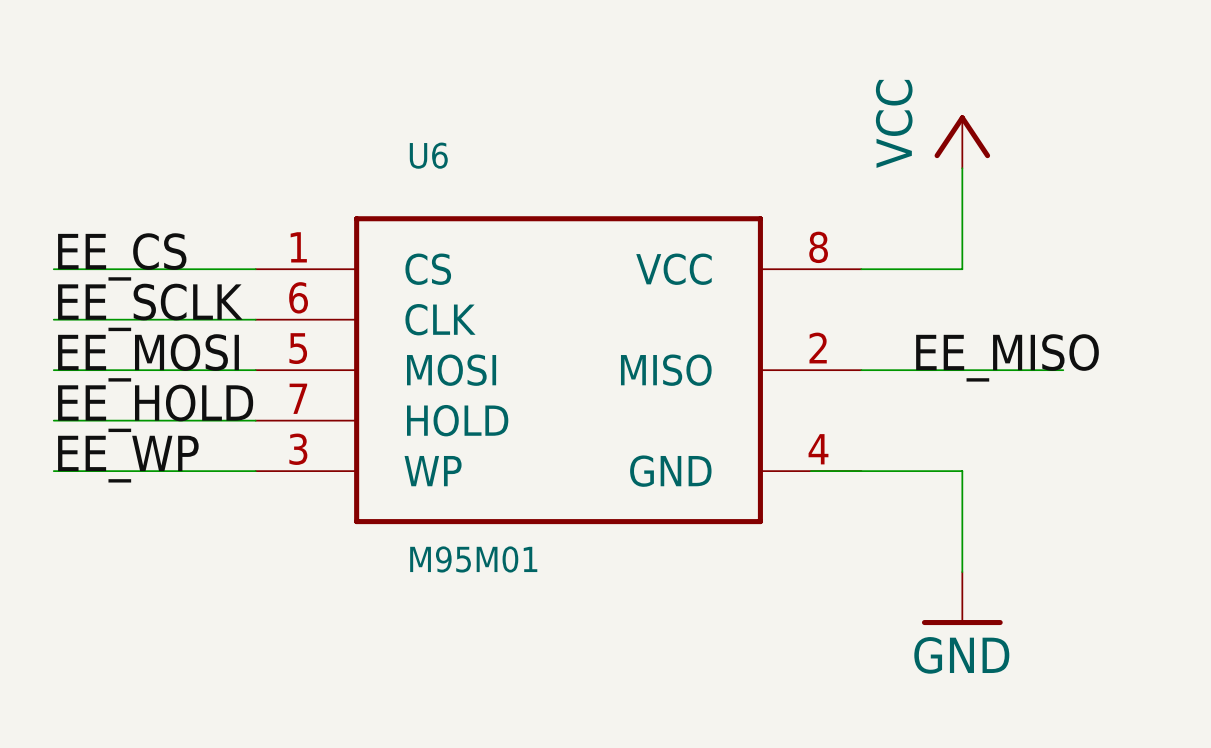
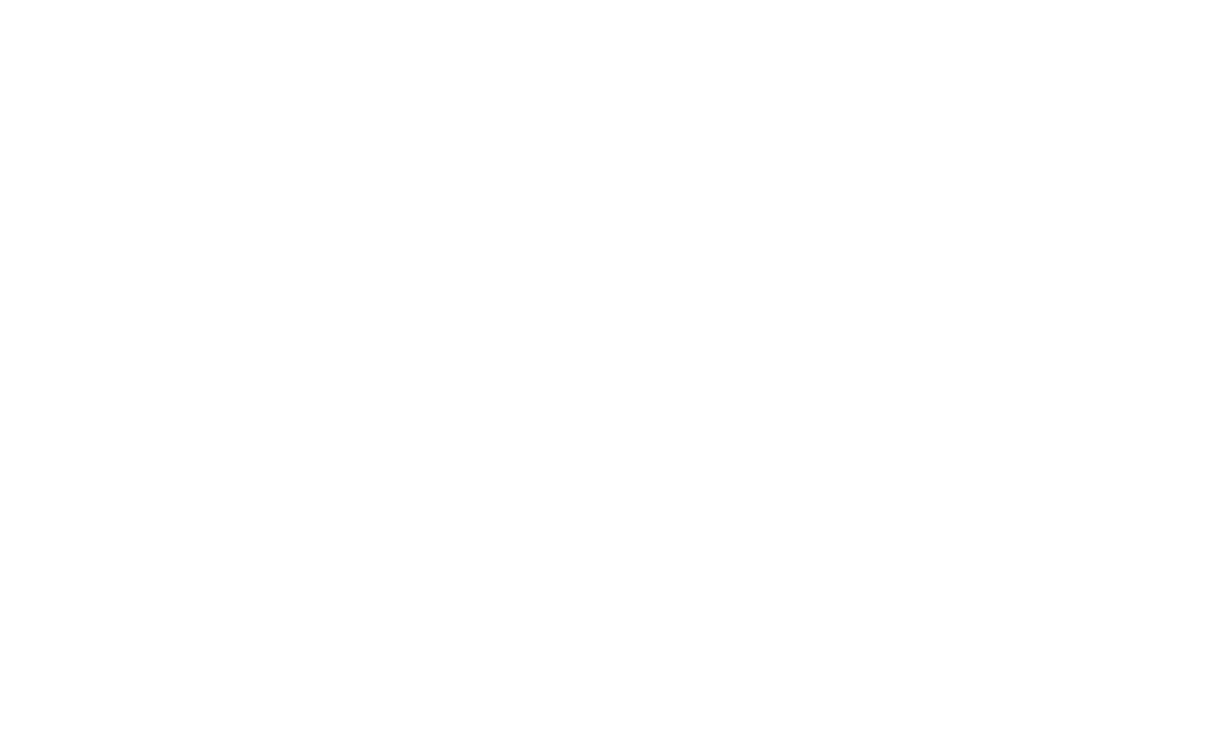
power symbol: VCC (962, 141) -> none
wire: (962, 168) (962, 269) (861, 269) -> none
label: EE_CS (122, 256) -> none
wire: (53, 269) (255, 269) -> none
label: EE_SCLK (150, 307) -> none
wire: (53, 319) (255, 319) -> none
label: EE_MOSI (148, 357) -> none
label: EE_MISO (1007, 357) -> none
wire: (53, 370) (255, 370) -> none
U6: M95M01 (558, 370) -> none
wire: (861, 370) (1063, 370) -> none
label: EE_HOLD (155, 408) -> none
wire: (53, 420) (255, 420) -> none
label: EE_WP (128, 459) -> none
wire: (53, 471) (255, 471) -> none
wire: (810, 471) (962, 471) (962, 572) -> none
power symbol: GND (962, 598) -> none

